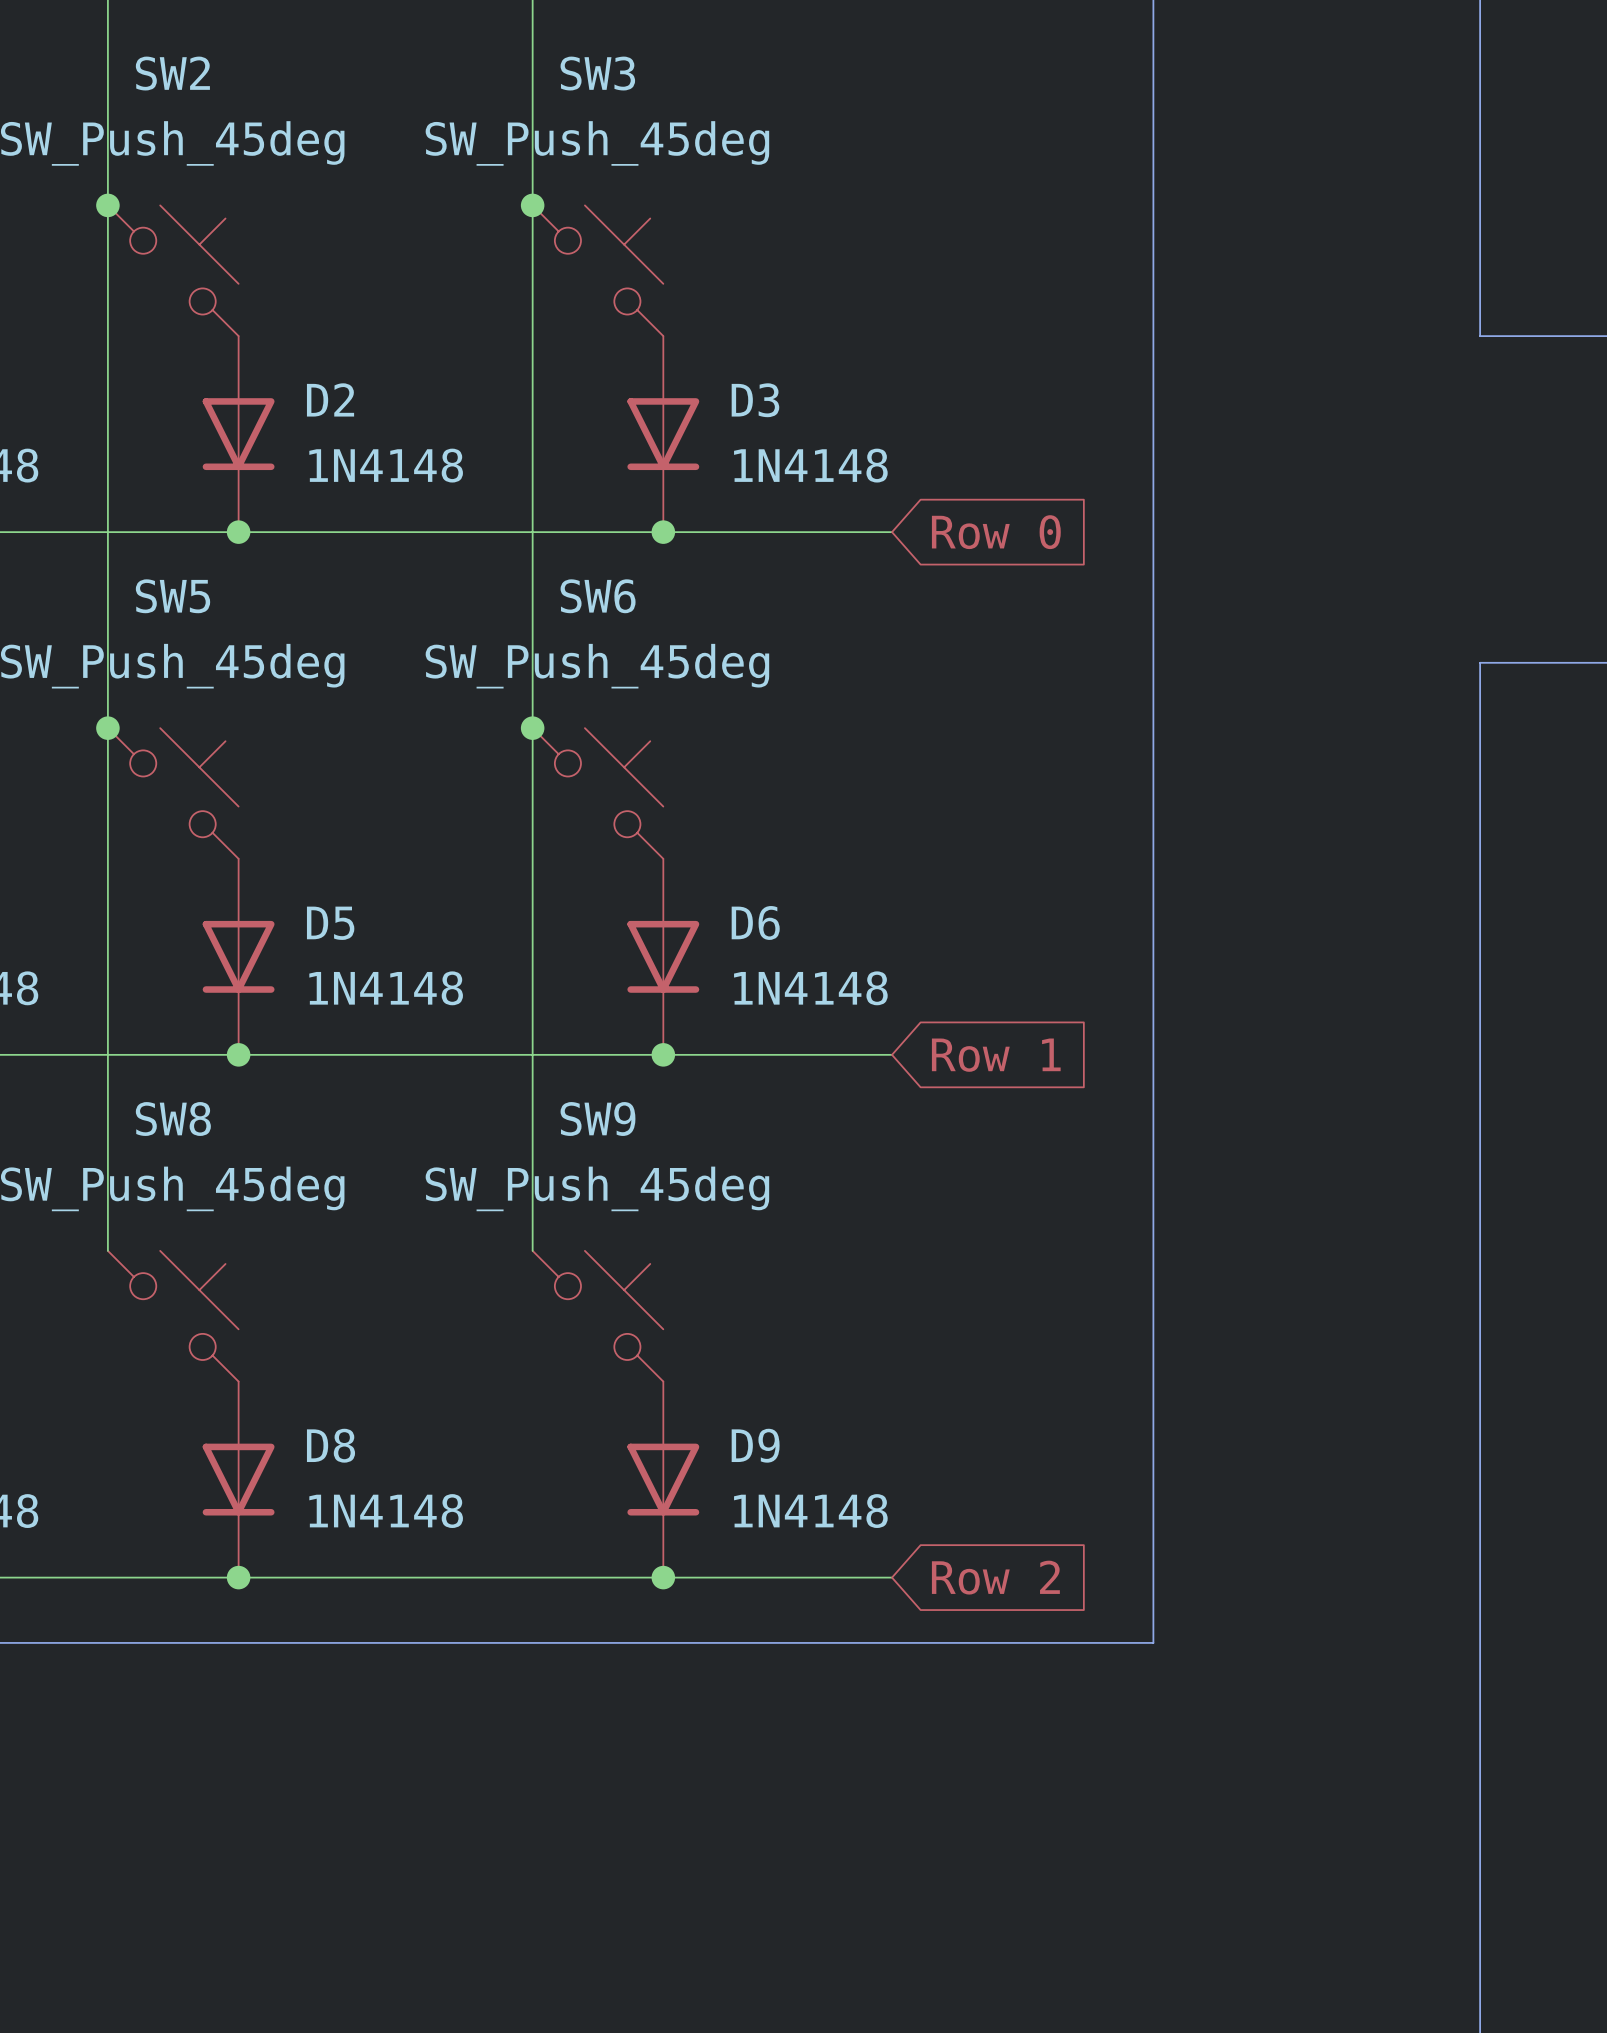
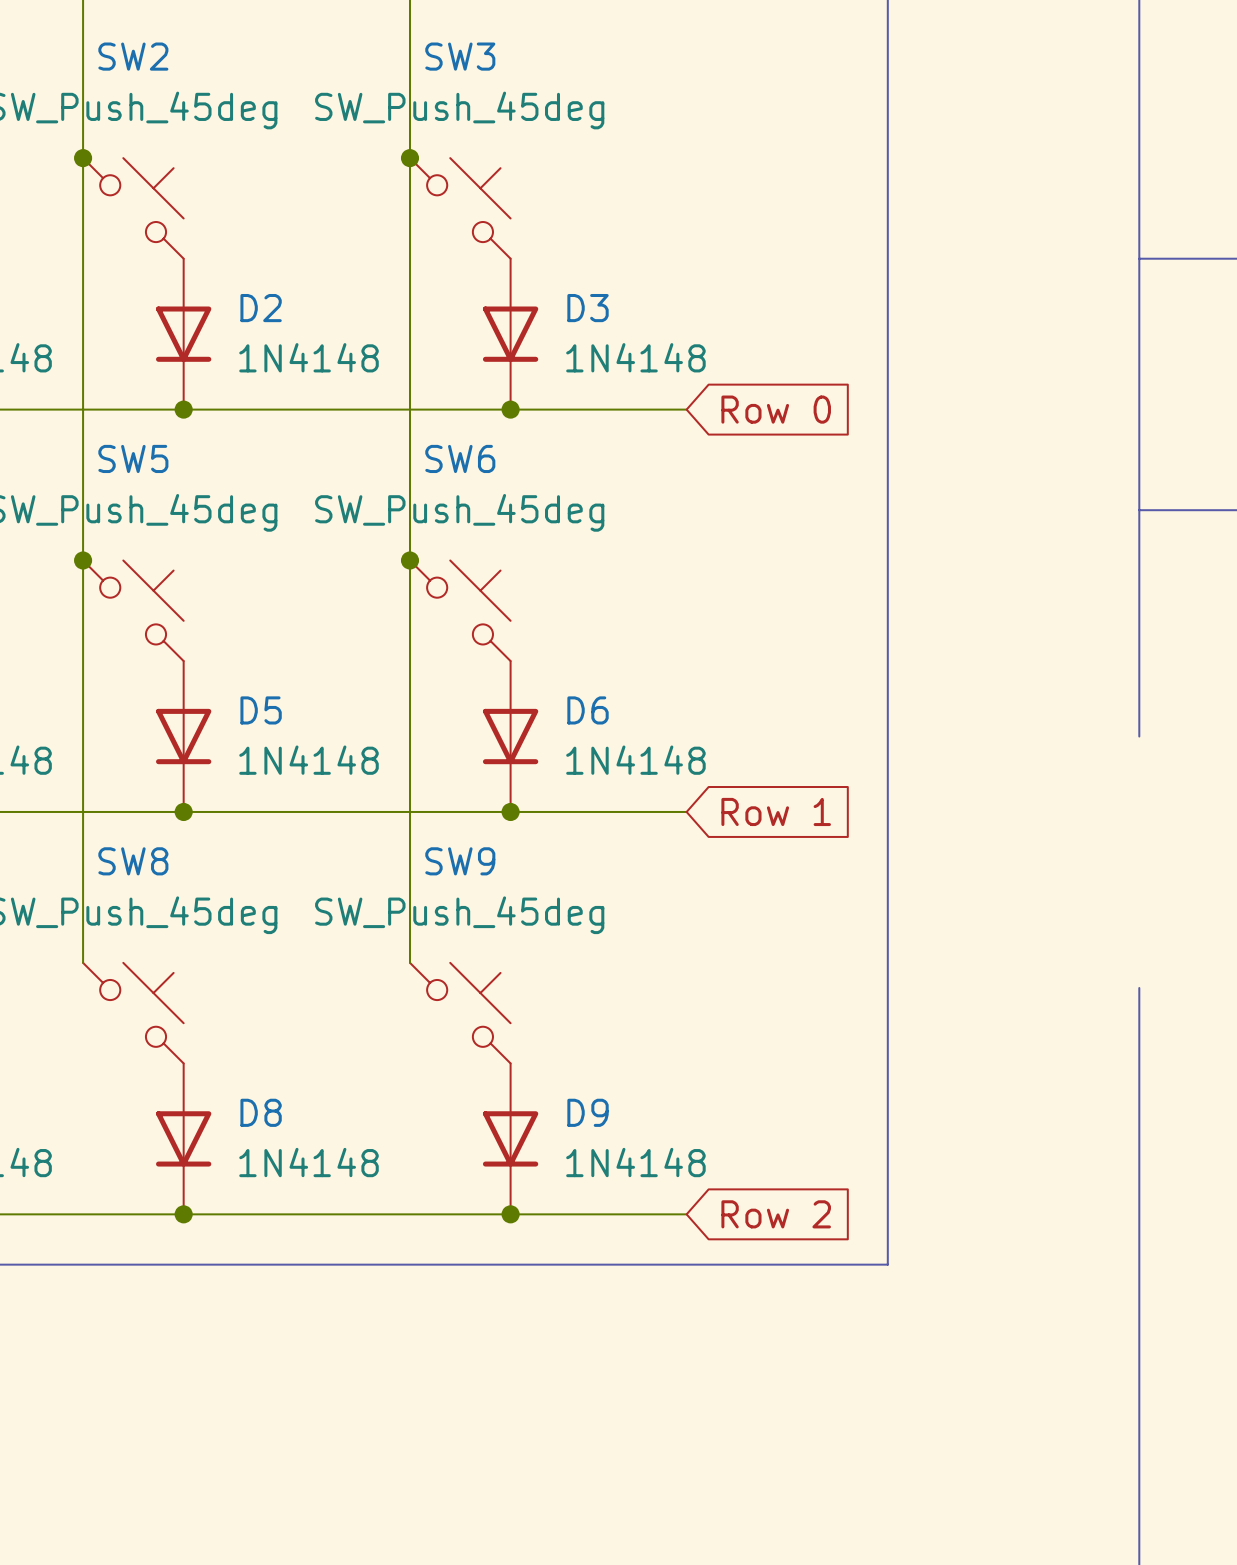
line: (1480, 956) (1480, 1283) -> (1139, 258) (1139, 510)

